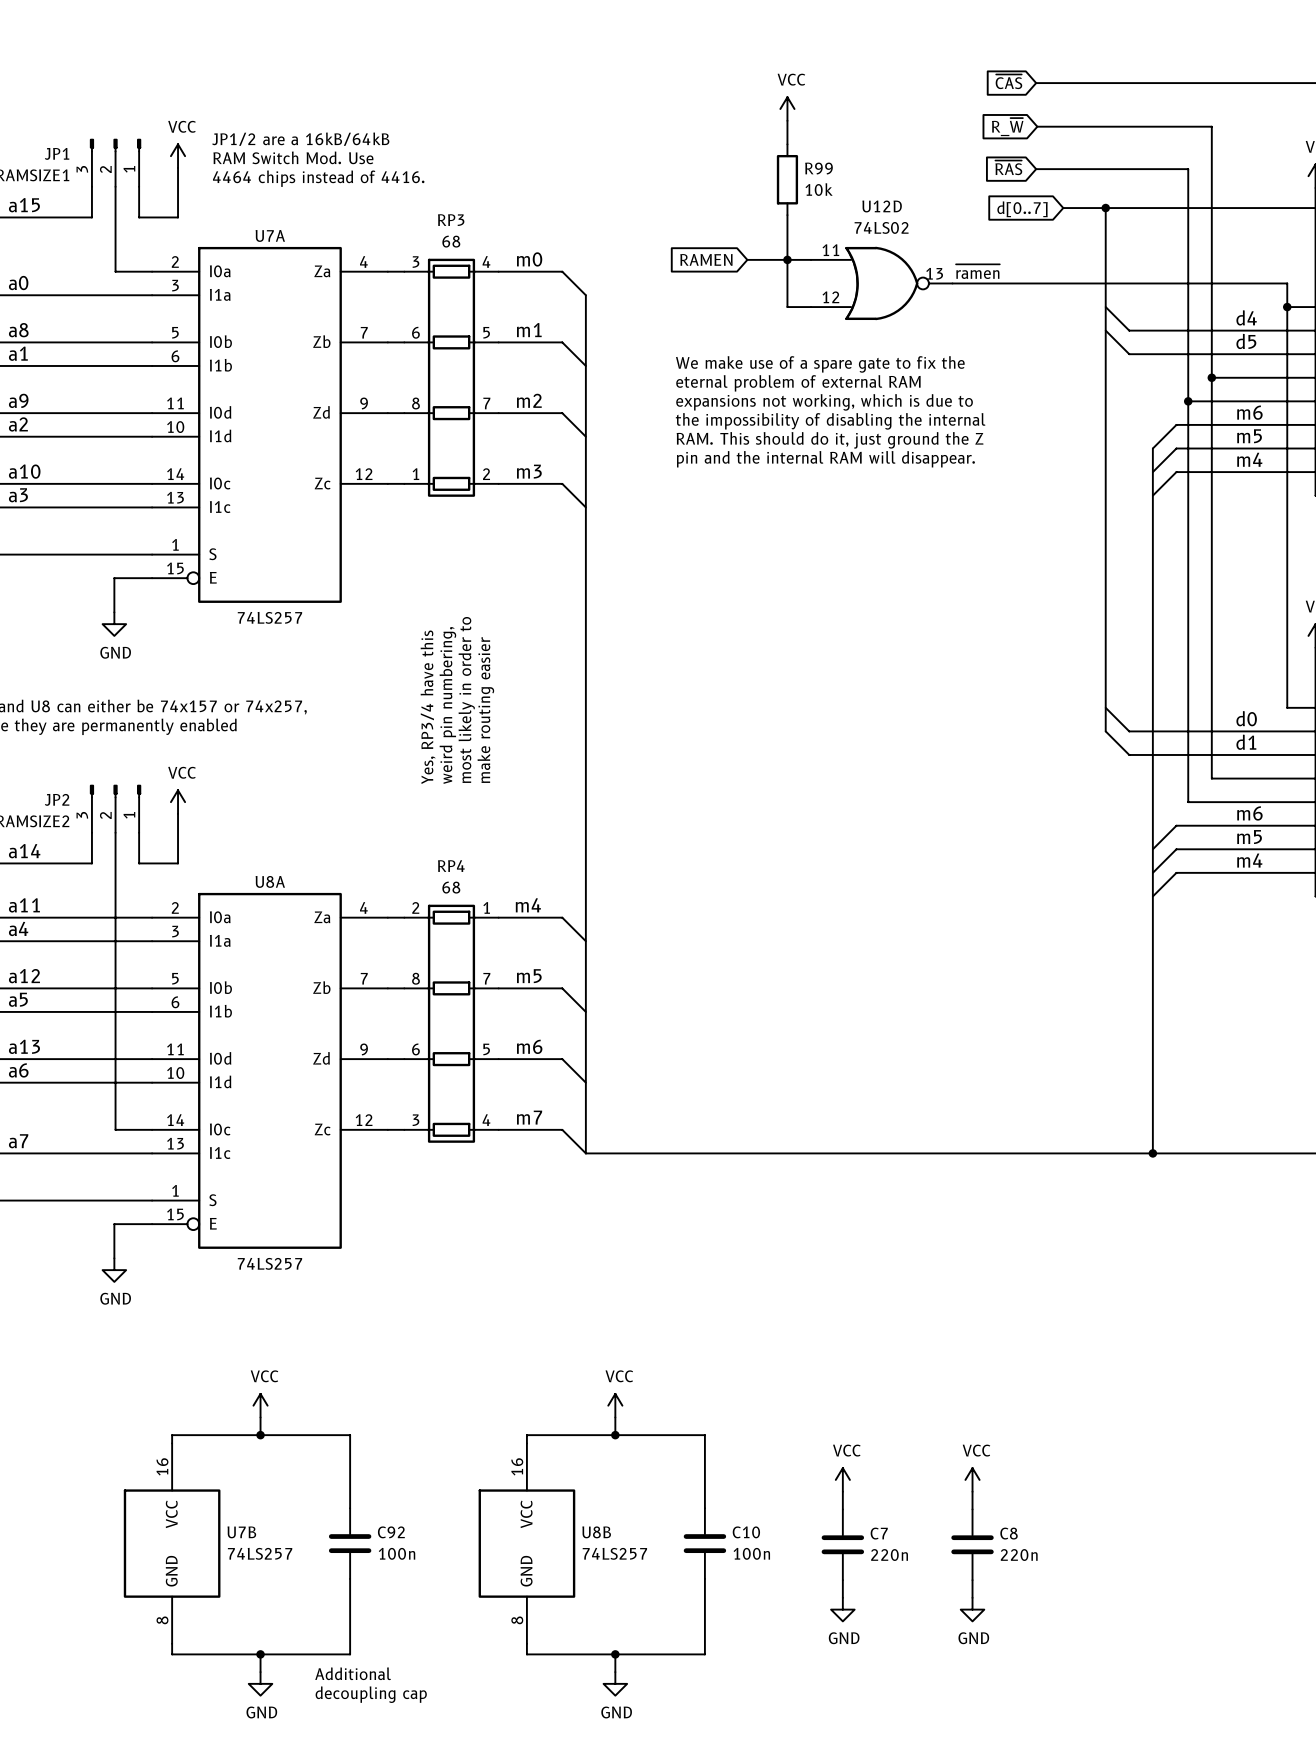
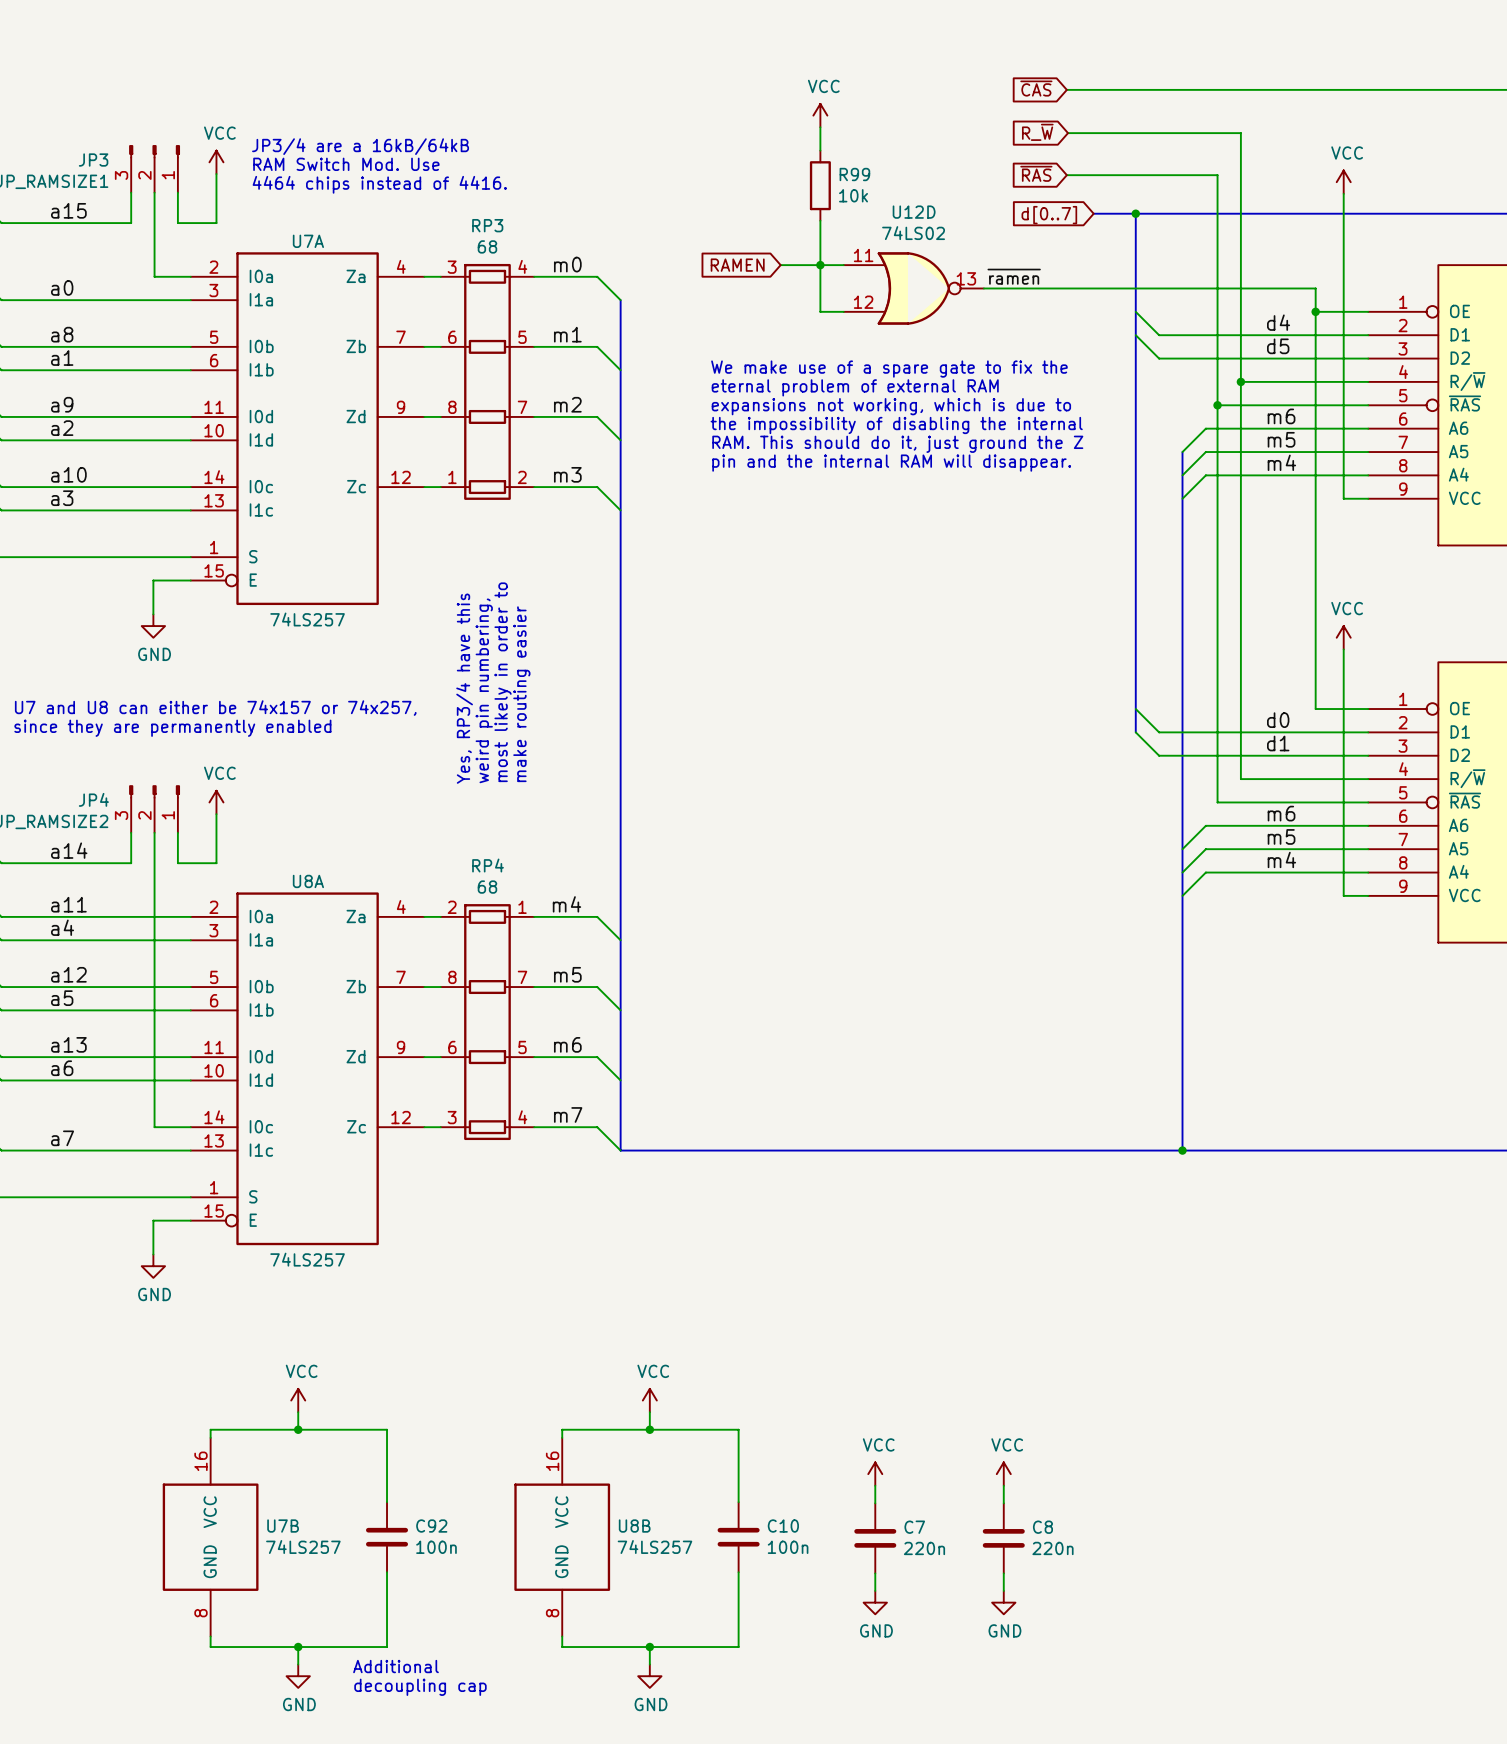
text: JP1/2 are a 16kB/64kB (300, 139) -> JP3/4 are a 16kB/64kB (360, 146)
JP1 name: JP1 (57, 153) -> JP3 (93, 160)
JP2 name: JP2 (57, 799) -> JP4 (93, 799)

